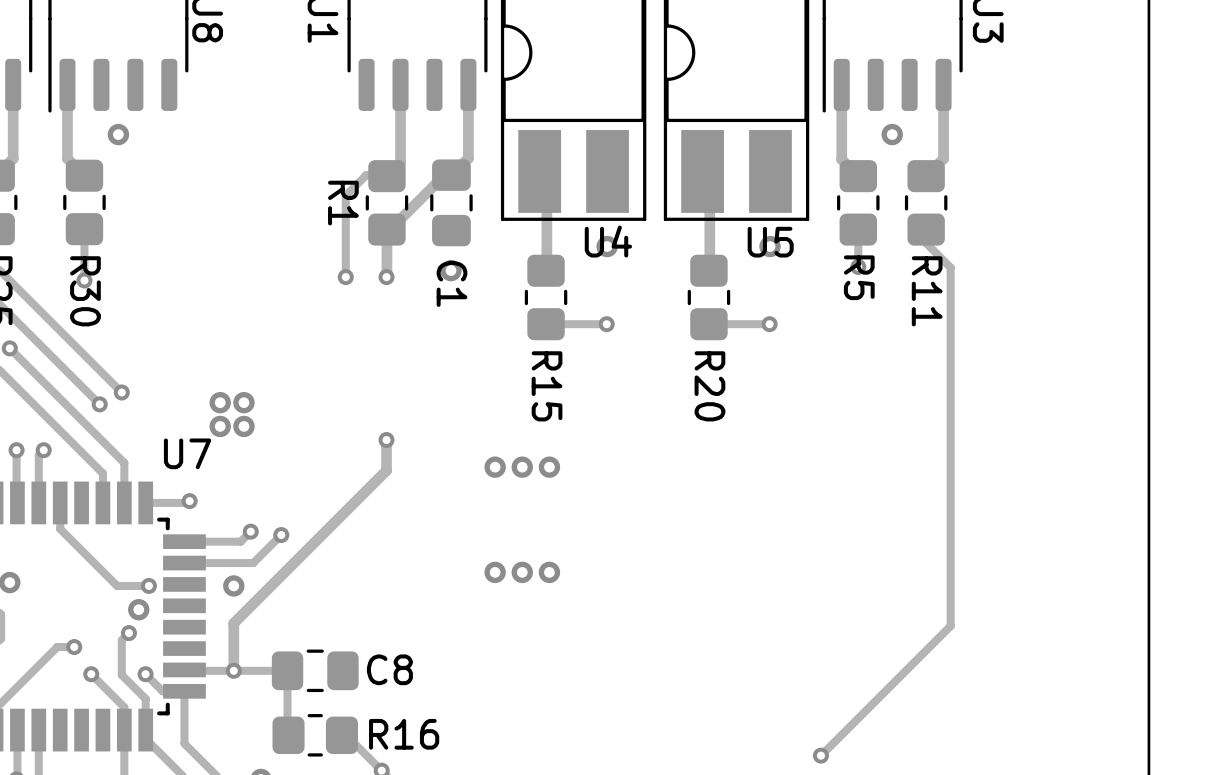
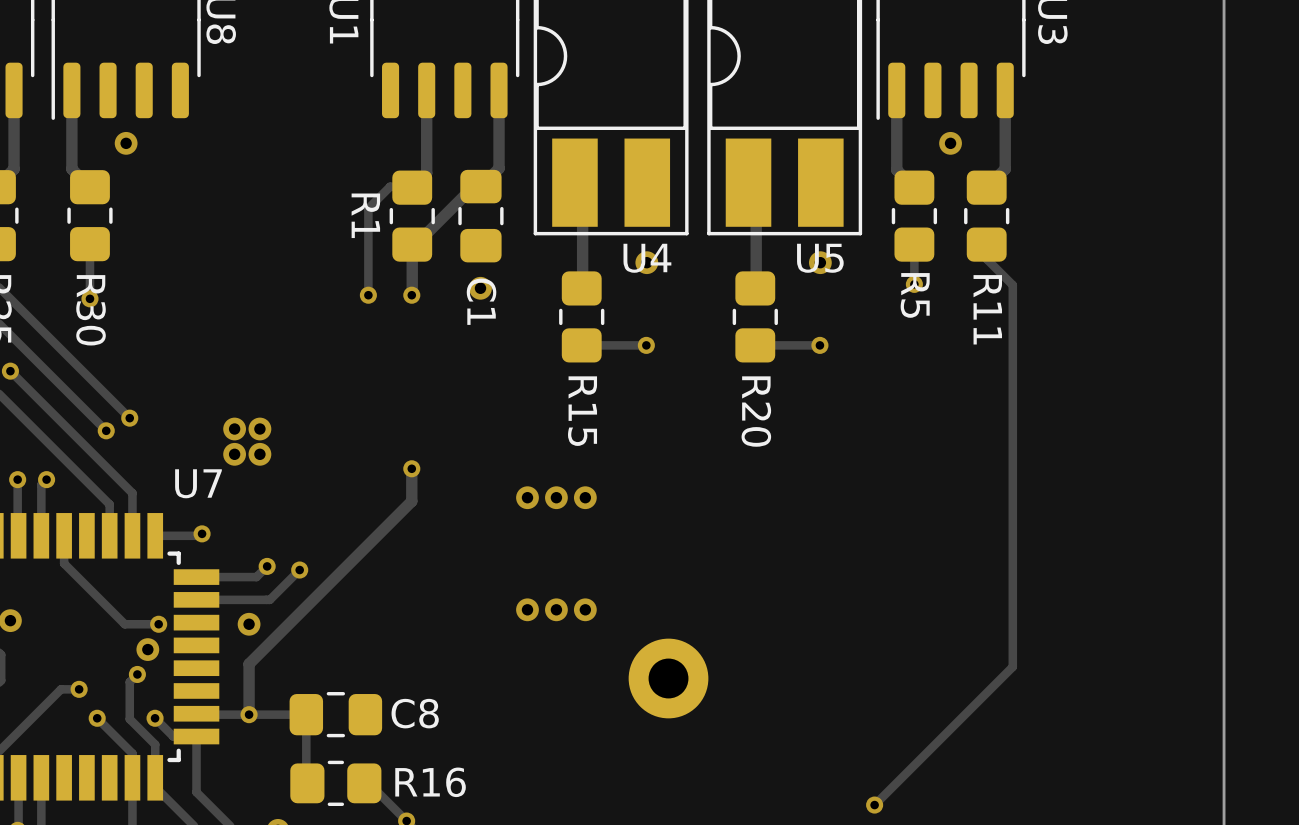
part: none -> (668, 678)

